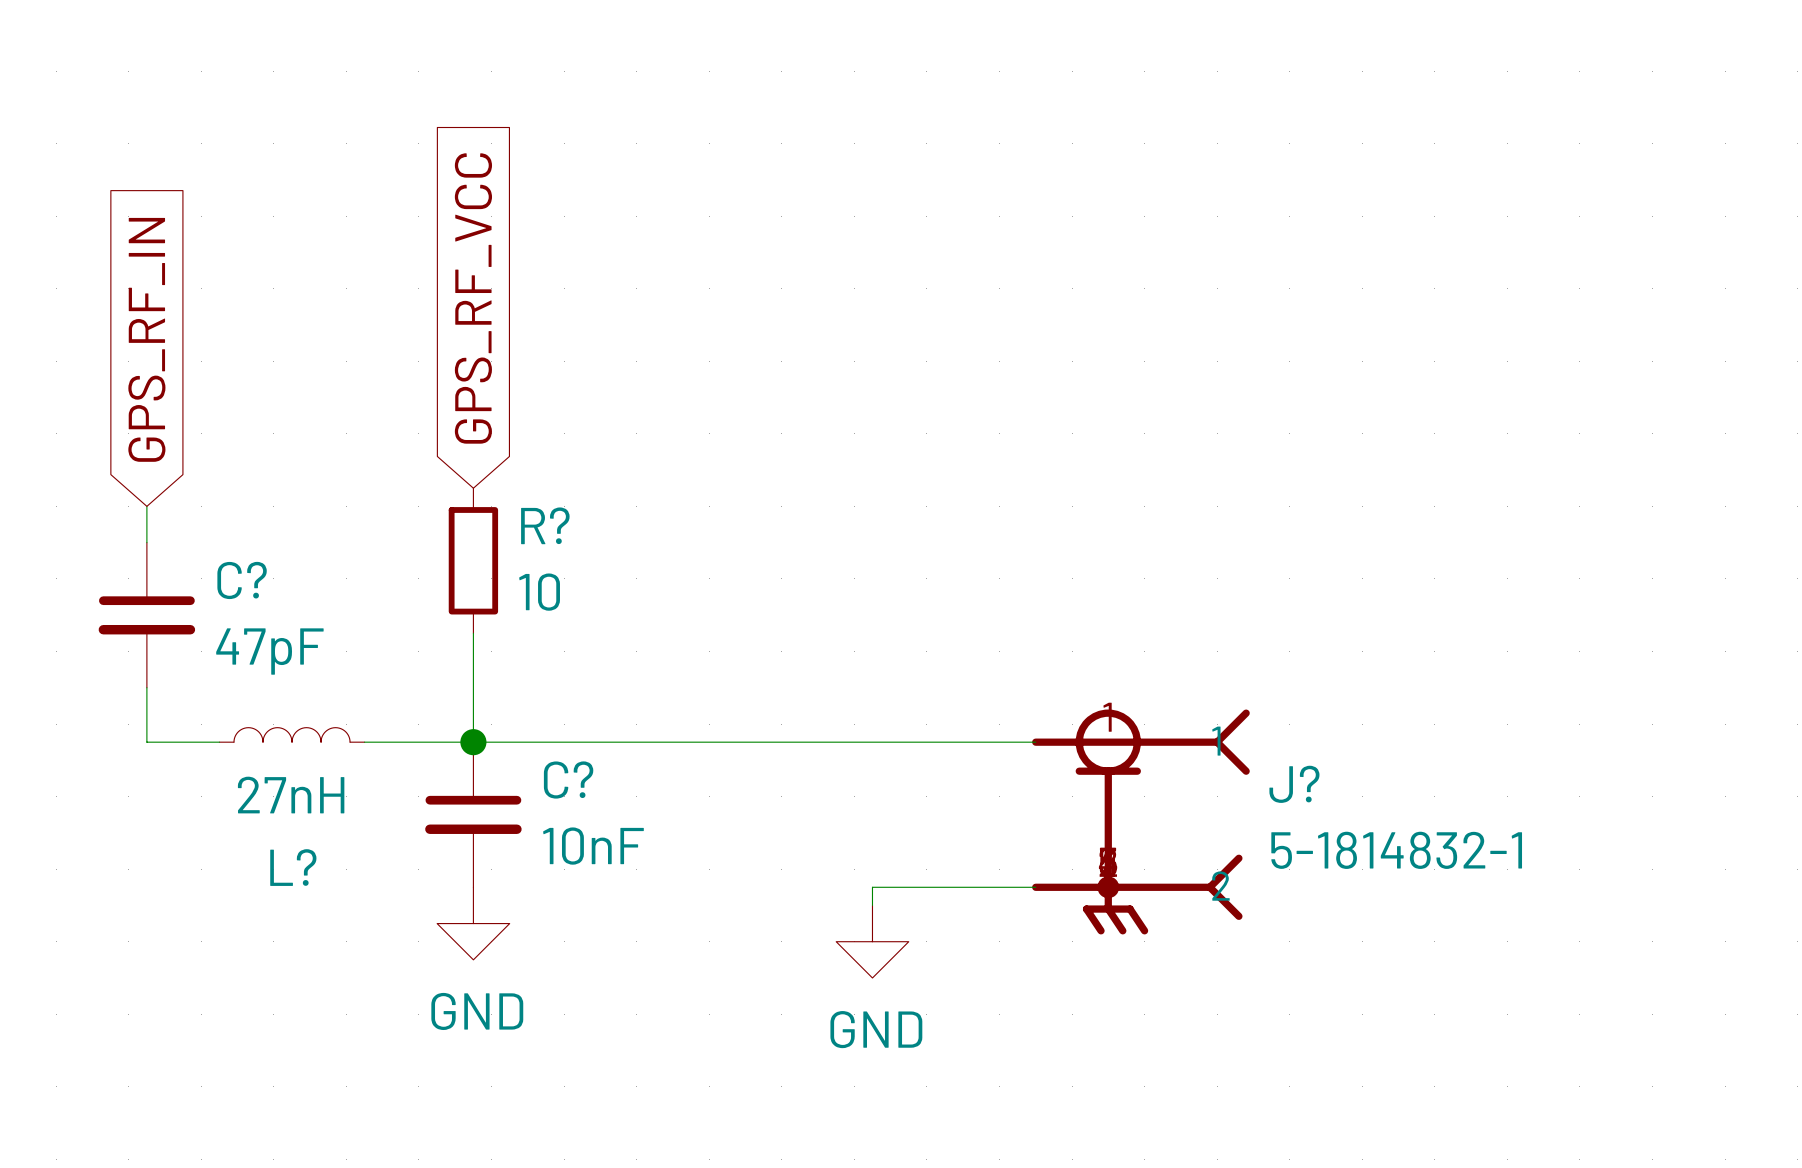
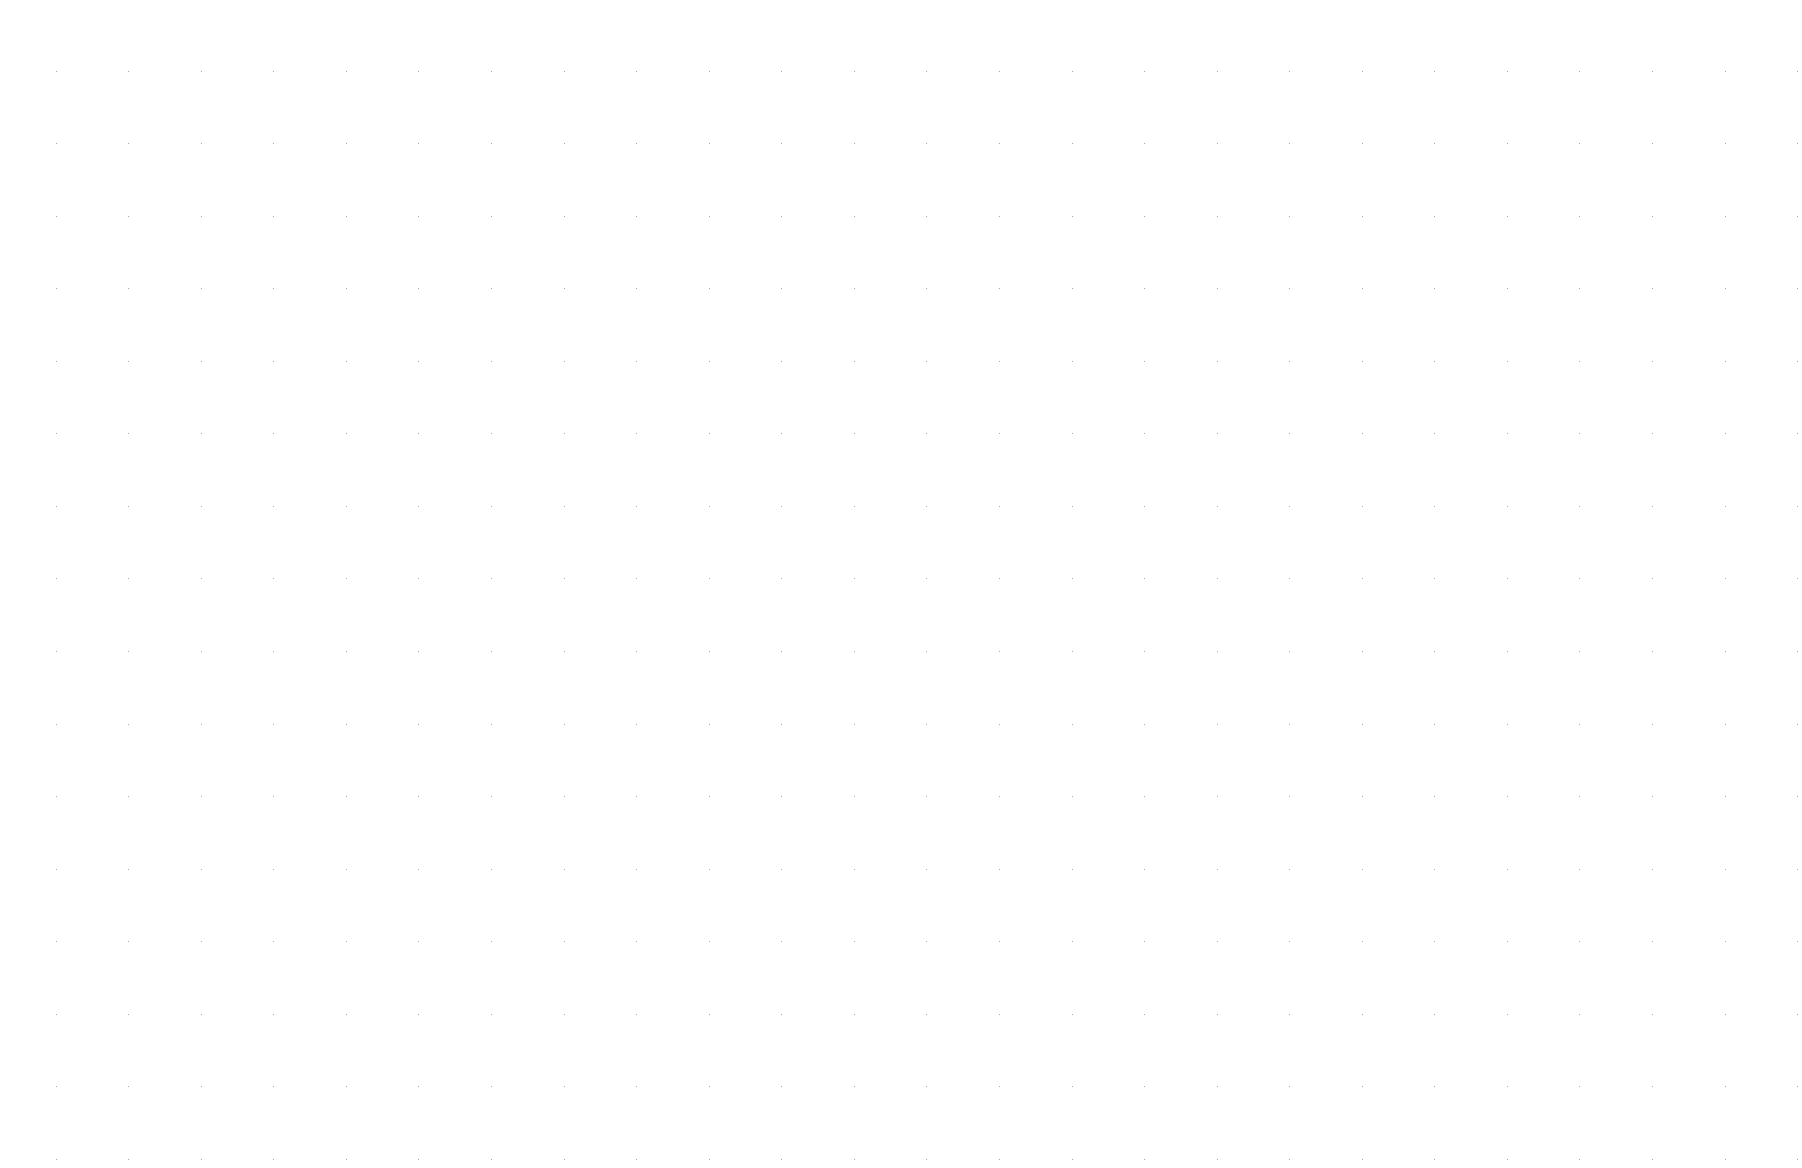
global label: GPS_RF_VCC (473, 298) -> none
global label: GPS_RF_IN (146, 339) -> none
wire: (146, 506) (146, 542) -> none
R?: 10 (473, 560) -> none
C?: 47pF (146, 615) -> none
wire: (473, 633) (473, 742) -> none
wire: (146, 687) (146, 742) (219, 742) -> none
L?: 27nH (292, 734) -> none
wire: (364, 742) (1035, 742) -> none
junction: (473, 742) -> none
C?: 10nF (473, 814) -> none
J?: 5-1814832-1 (1140, 821) -> none
wire: (1035, 887) (872, 887) (872, 905) -> none
power symbol: GND (473, 923) -> none
power symbol: GND (872, 941) -> none

